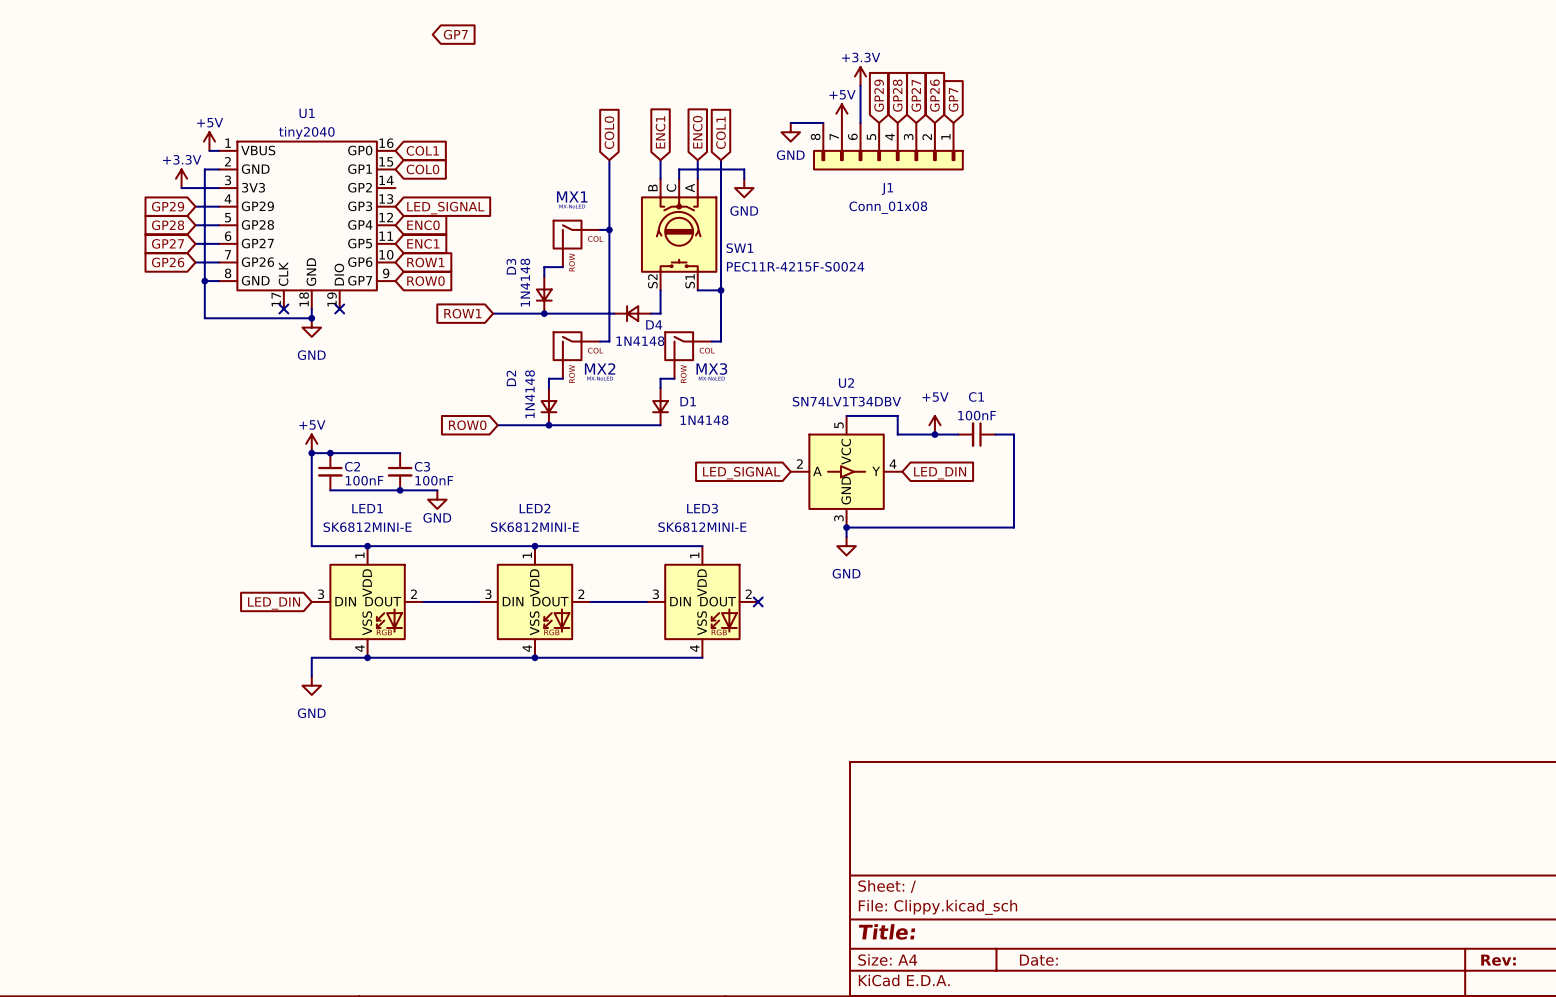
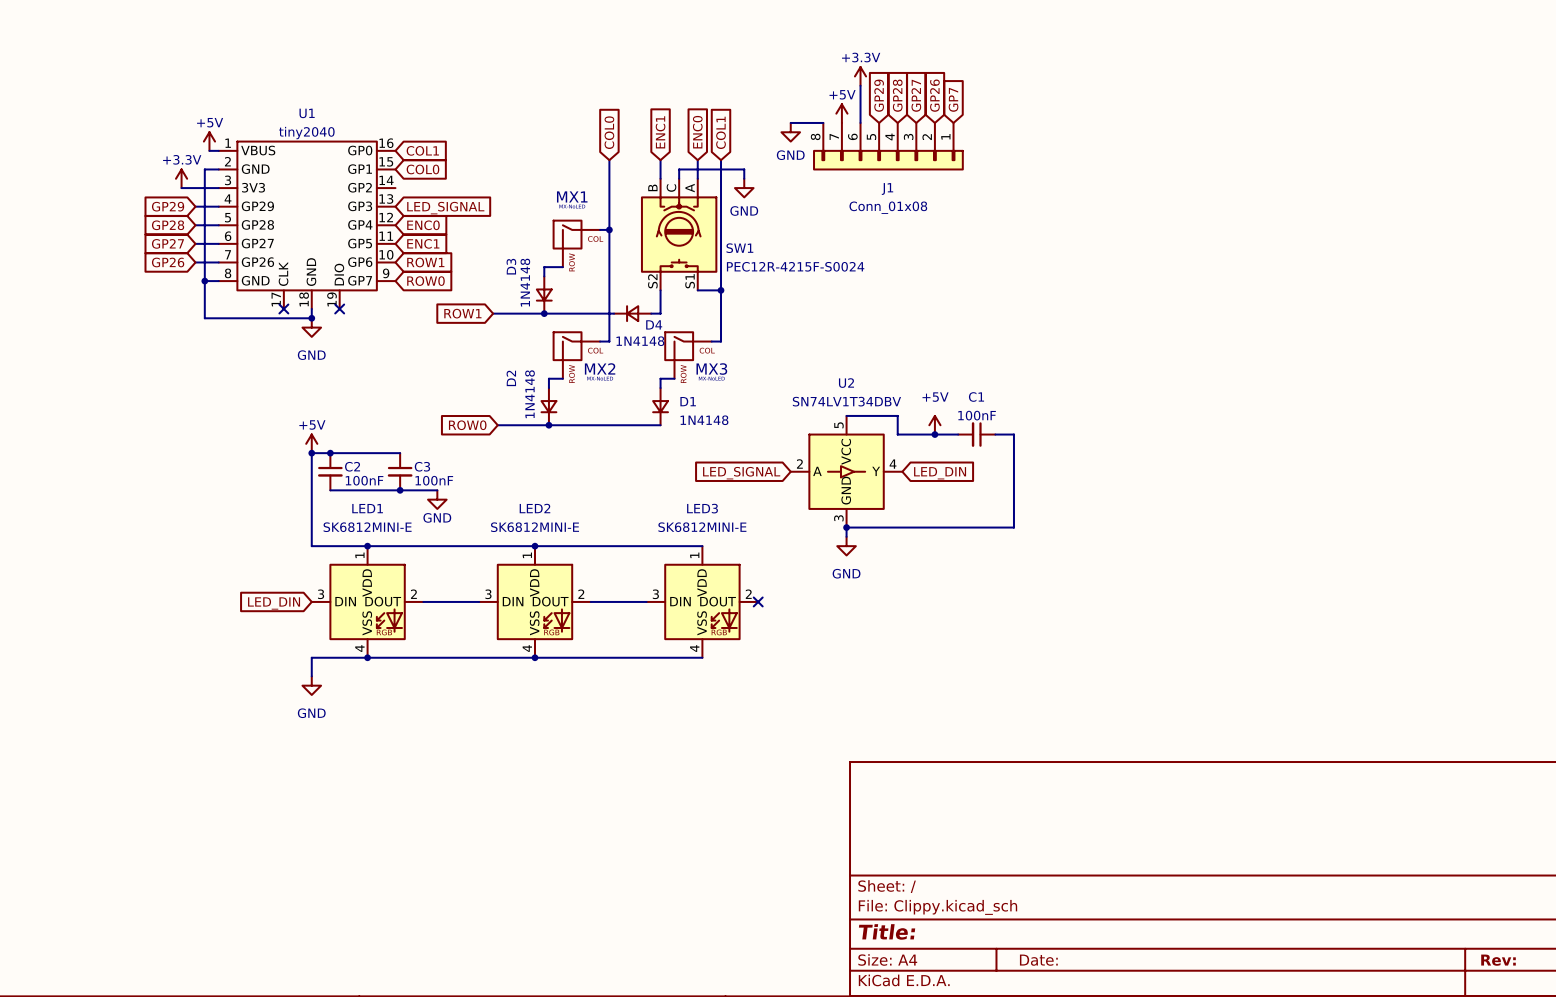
global label: GP7 (455, 34) -> none
SW1 value: PEC11R-4215F-S0024 (795, 266) -> PEC12R-4215F-S0024 (795, 266)

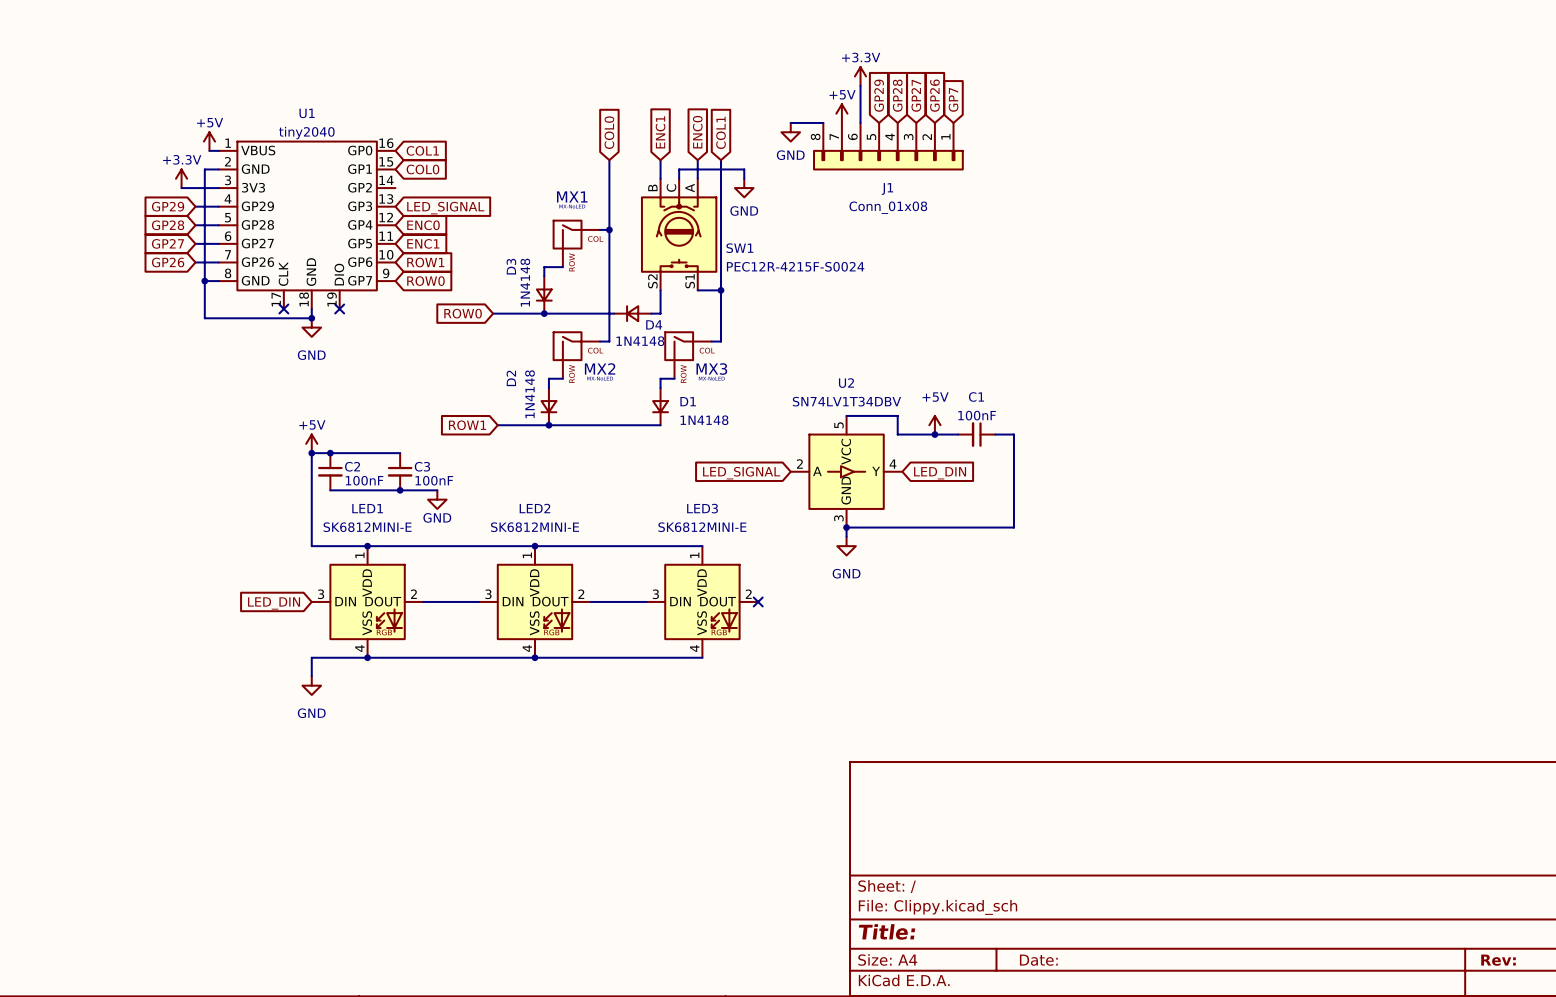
global label: ROW1 (462, 313) -> ROW0 (463, 313)
global label: ROW0 (467, 425) -> ROW1 (467, 425)

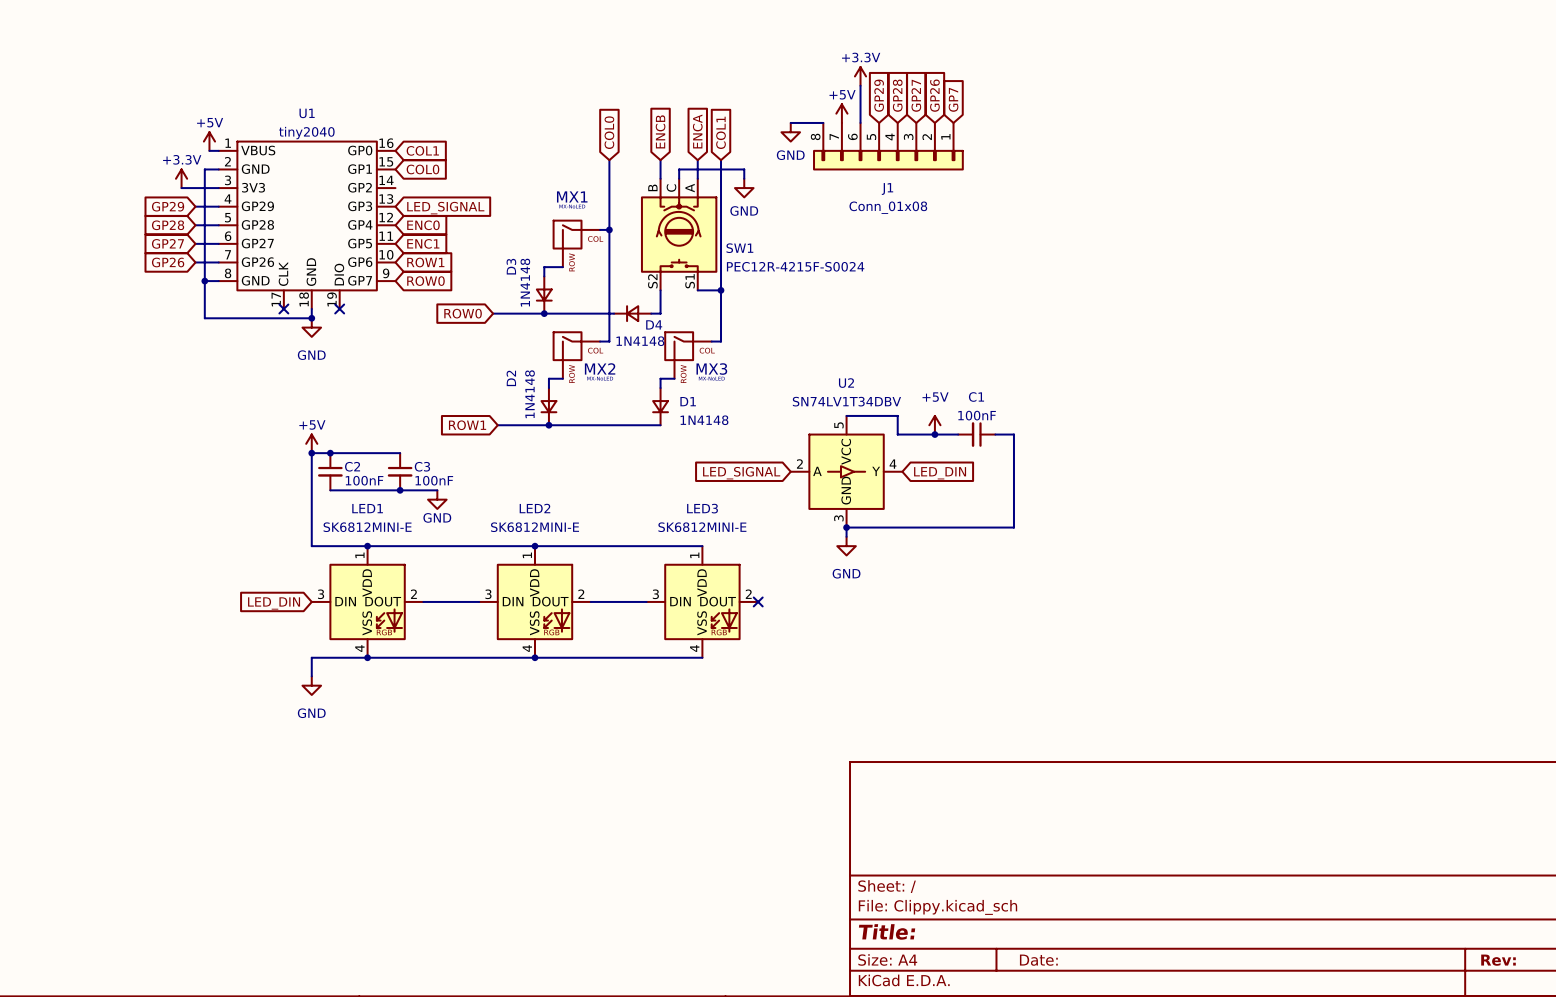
global label: ENC1 (660, 132) -> ENCB (660, 131)
global label: ENC0 (697, 132) -> ENCA (697, 131)

